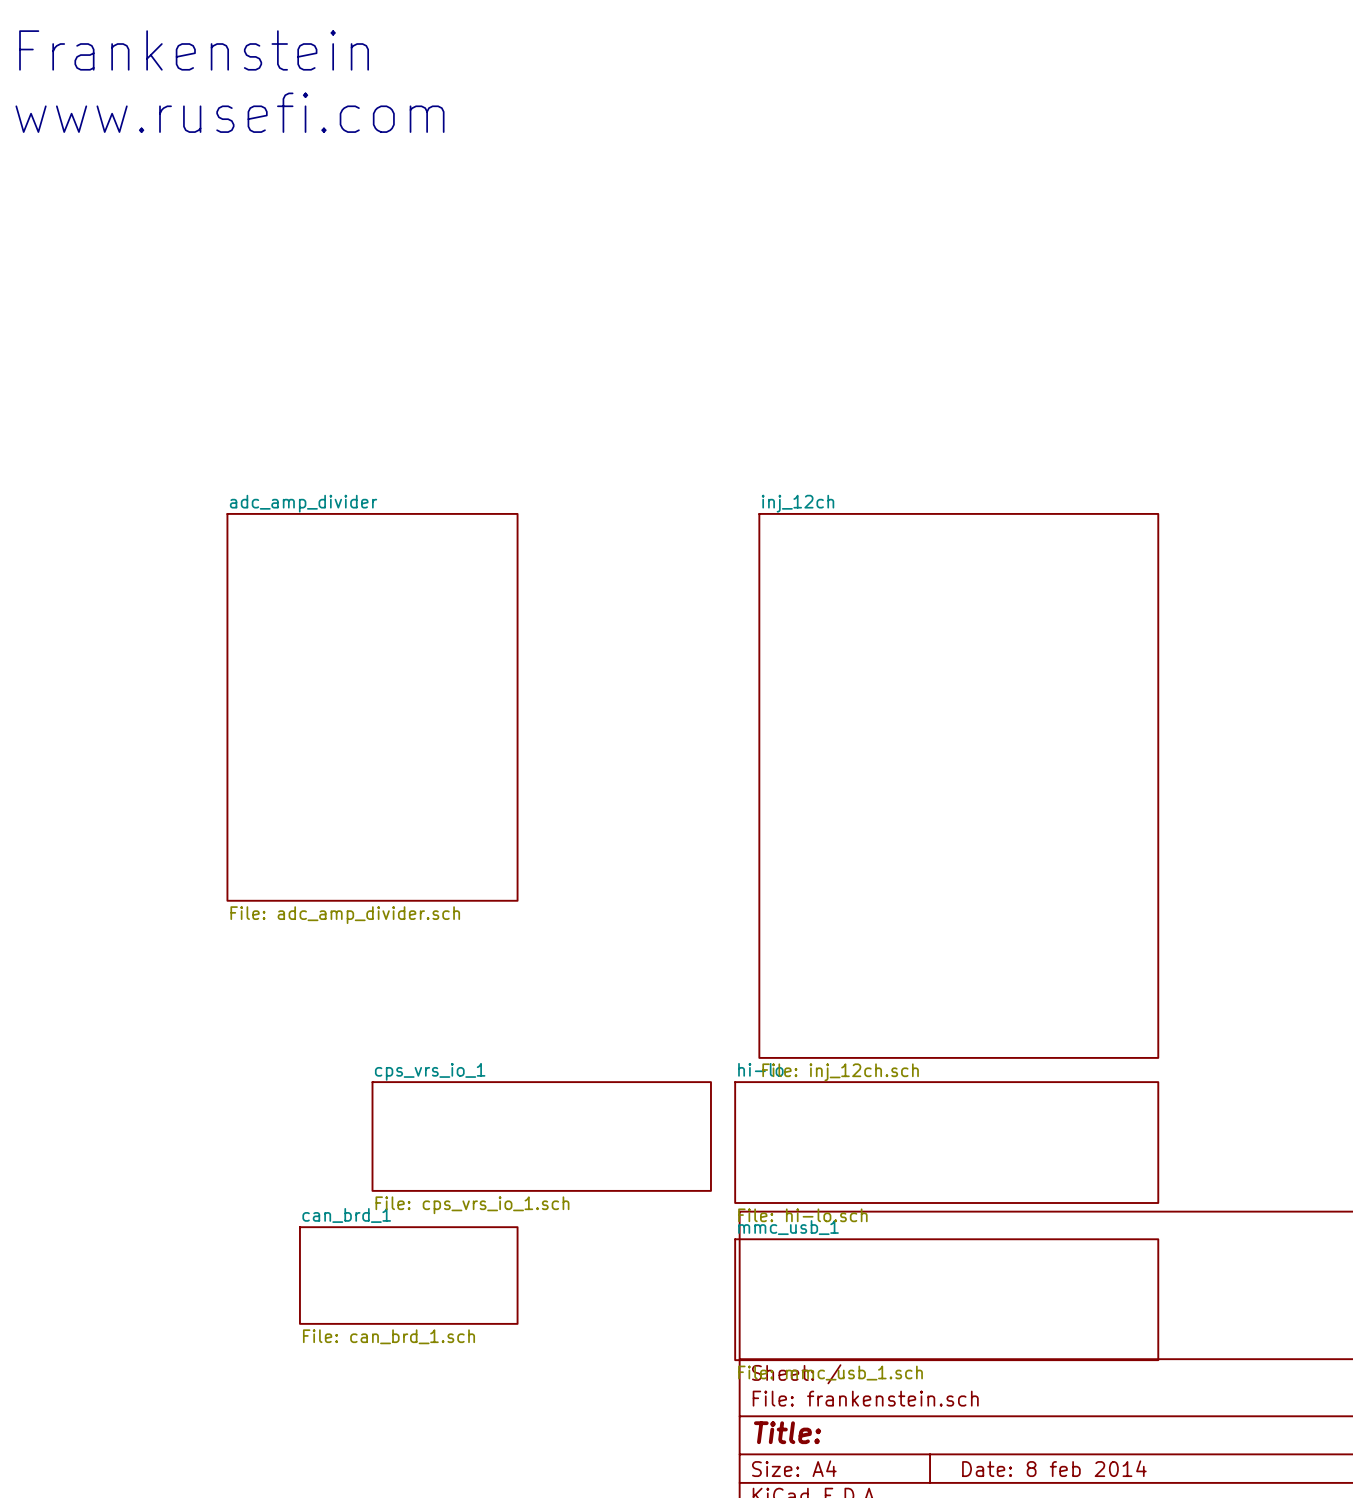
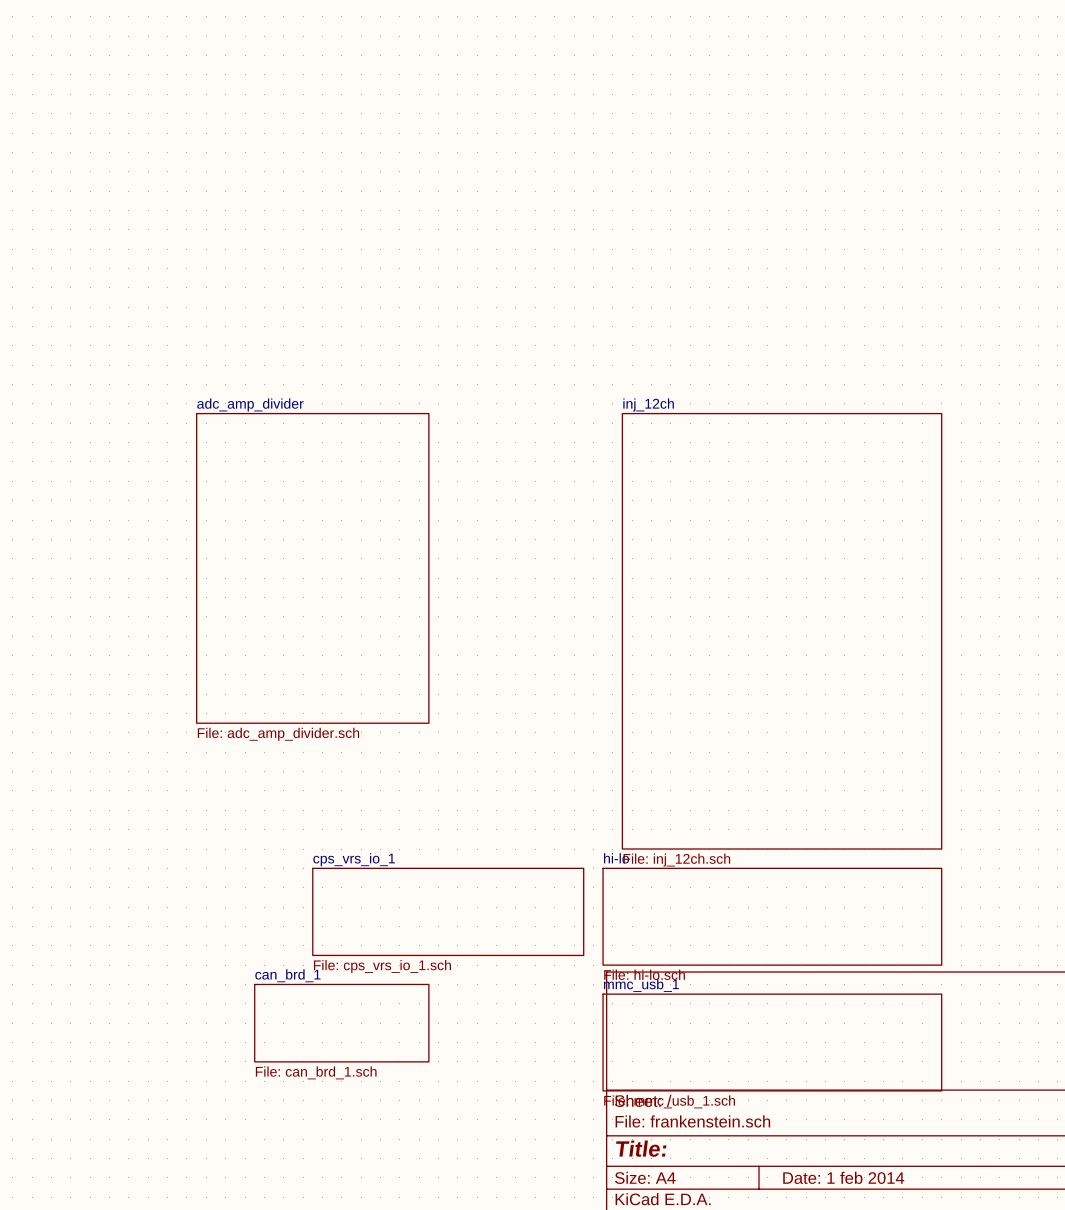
text: Frankenstein (194, 50) -> none
text: www.rusefi.com (230, 112) -> none
title block: Date: 8 feb 2014 (1054, 1468) -> Date: 1 feb 2014 (843, 1177)

